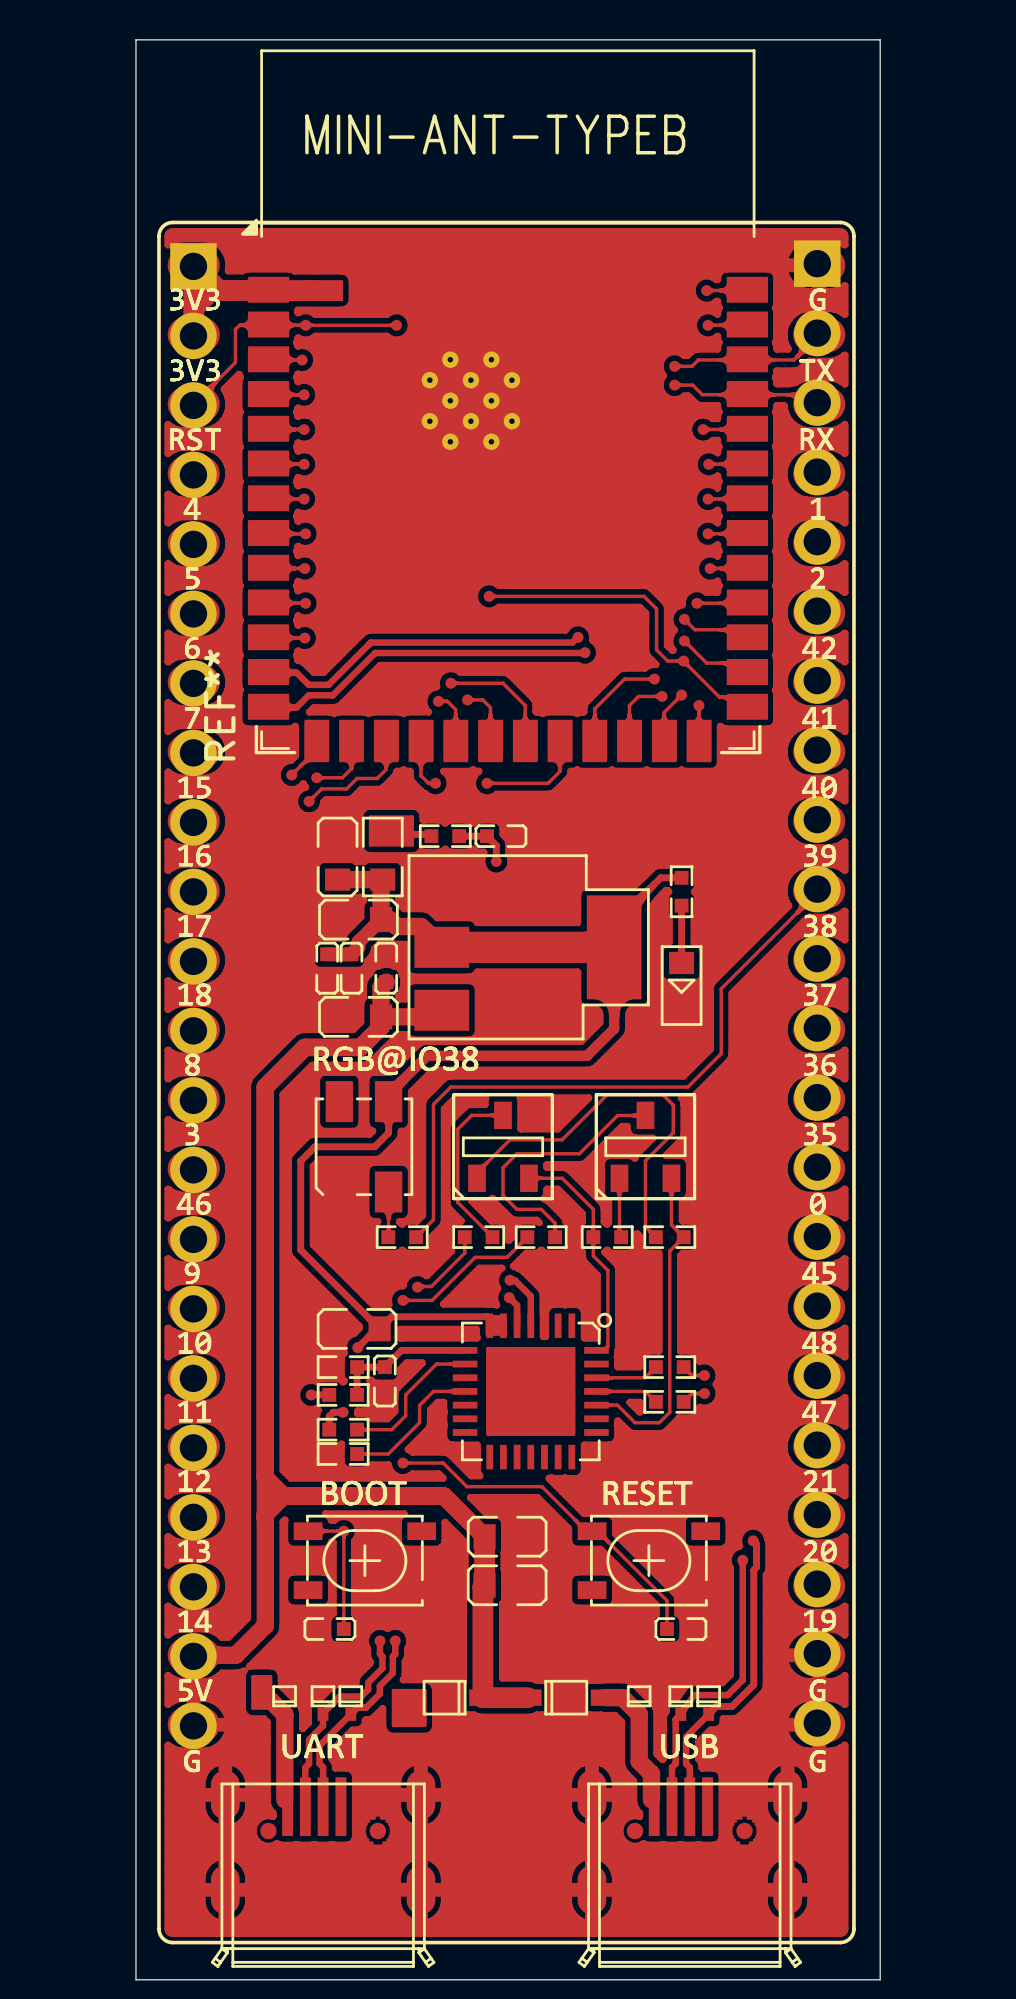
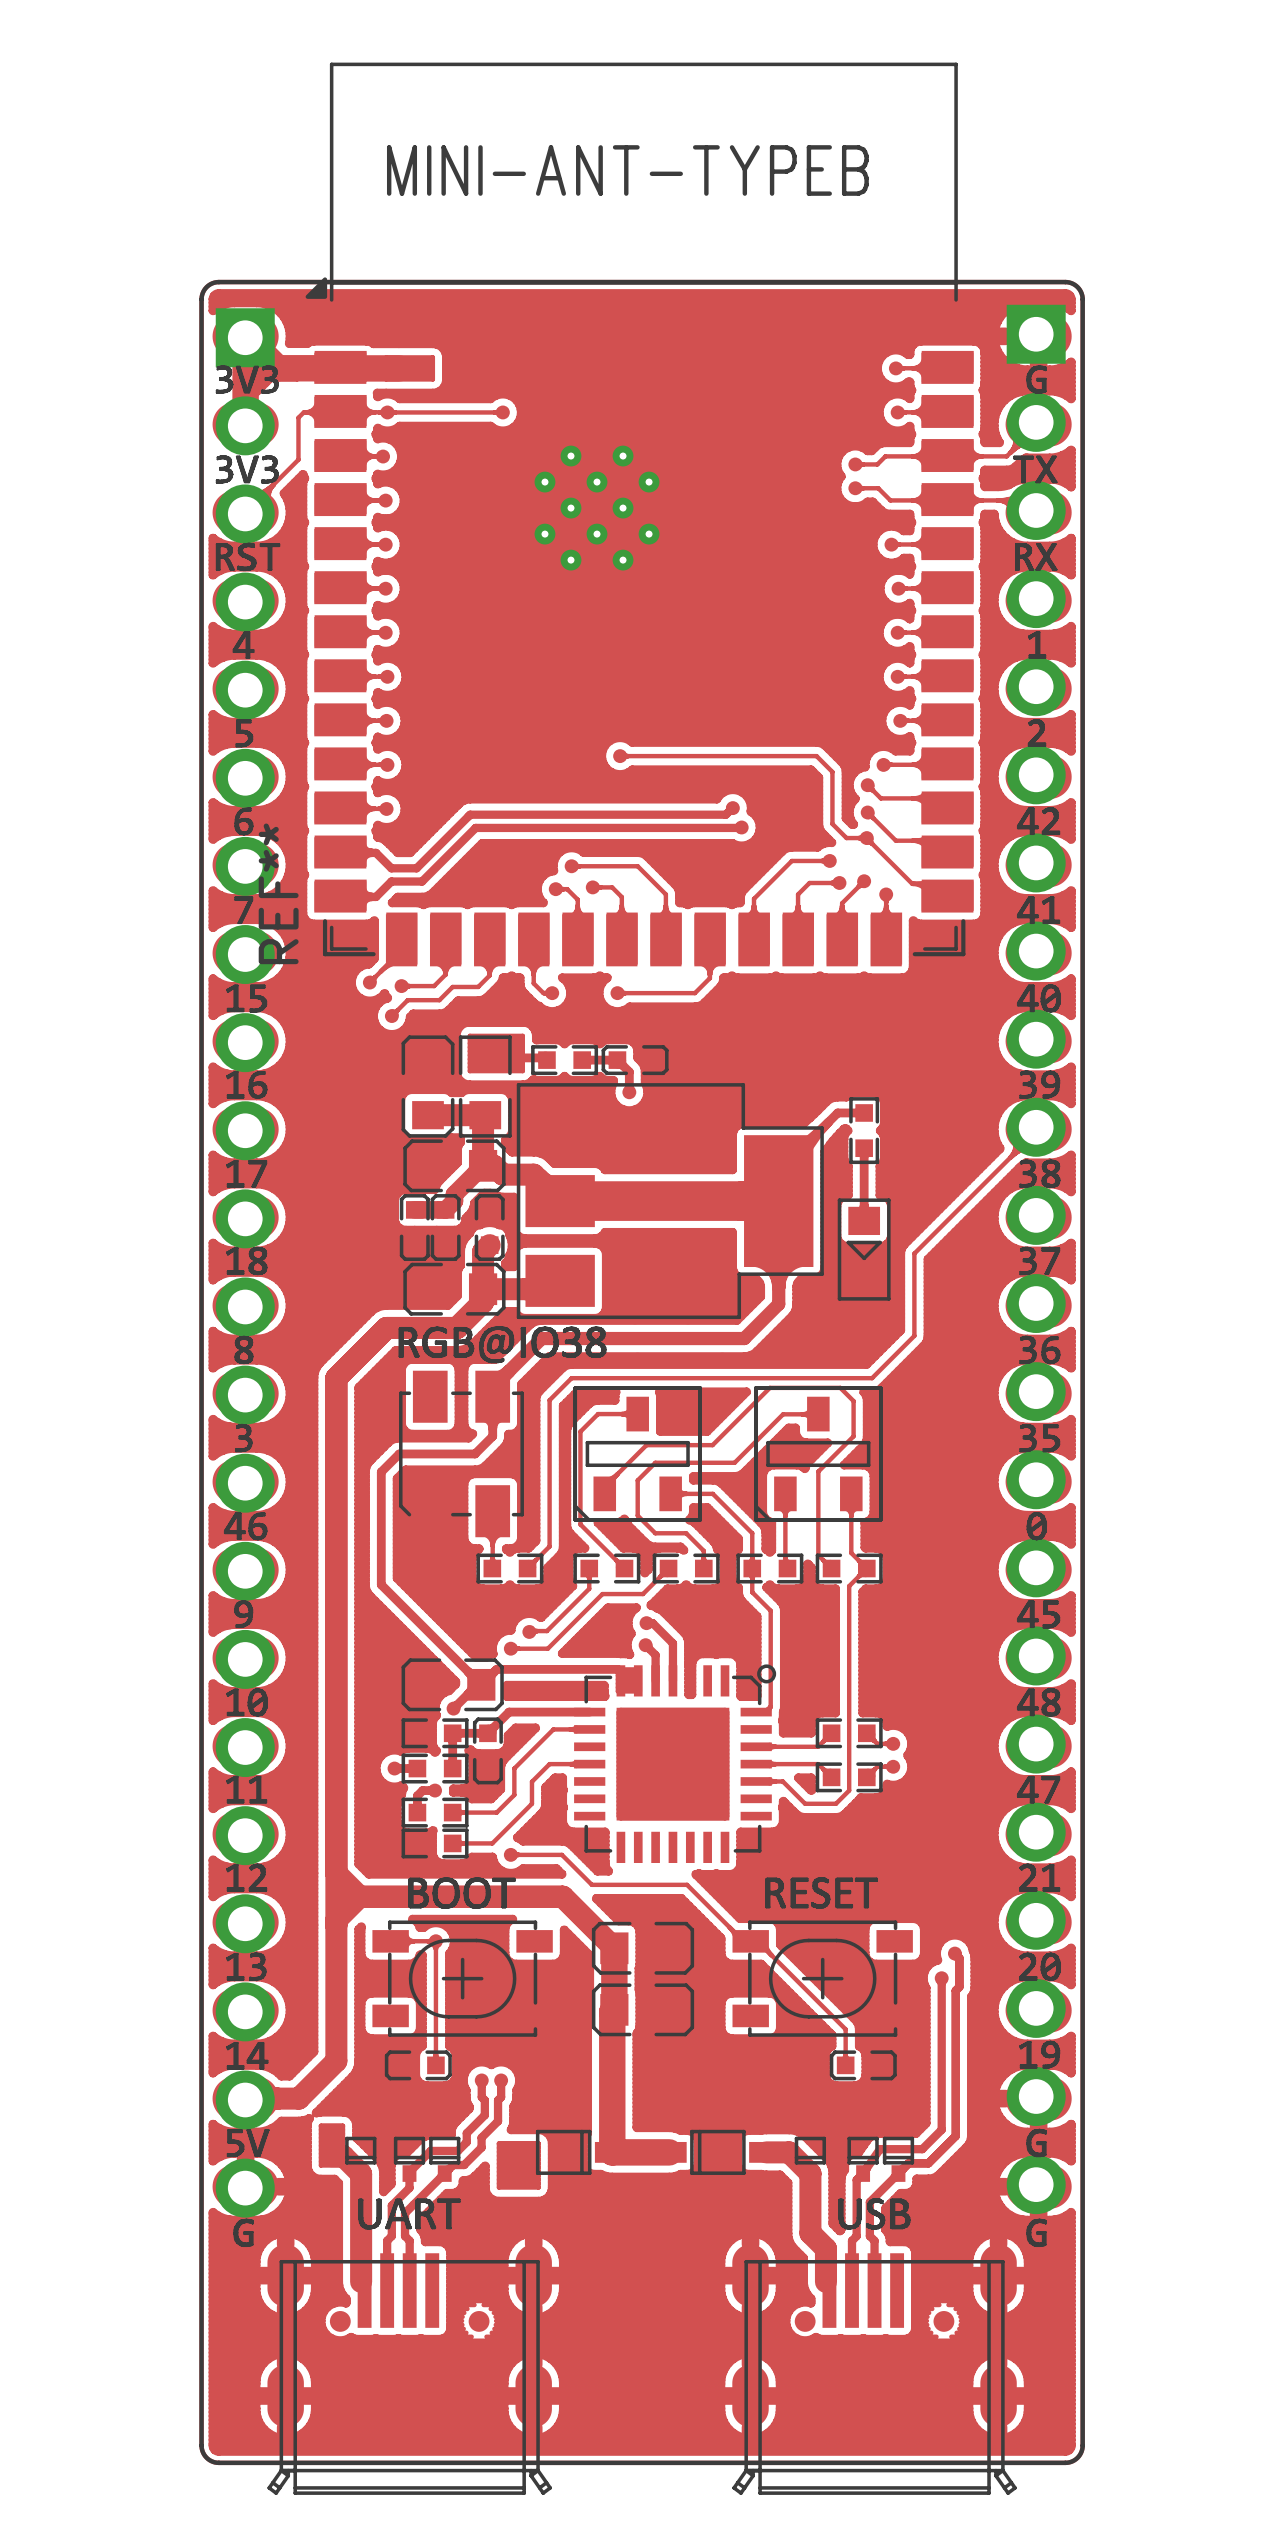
board edge: (135, 39) (880, 39) (880, 1979) (135, 1979) (135, 39) -> none

